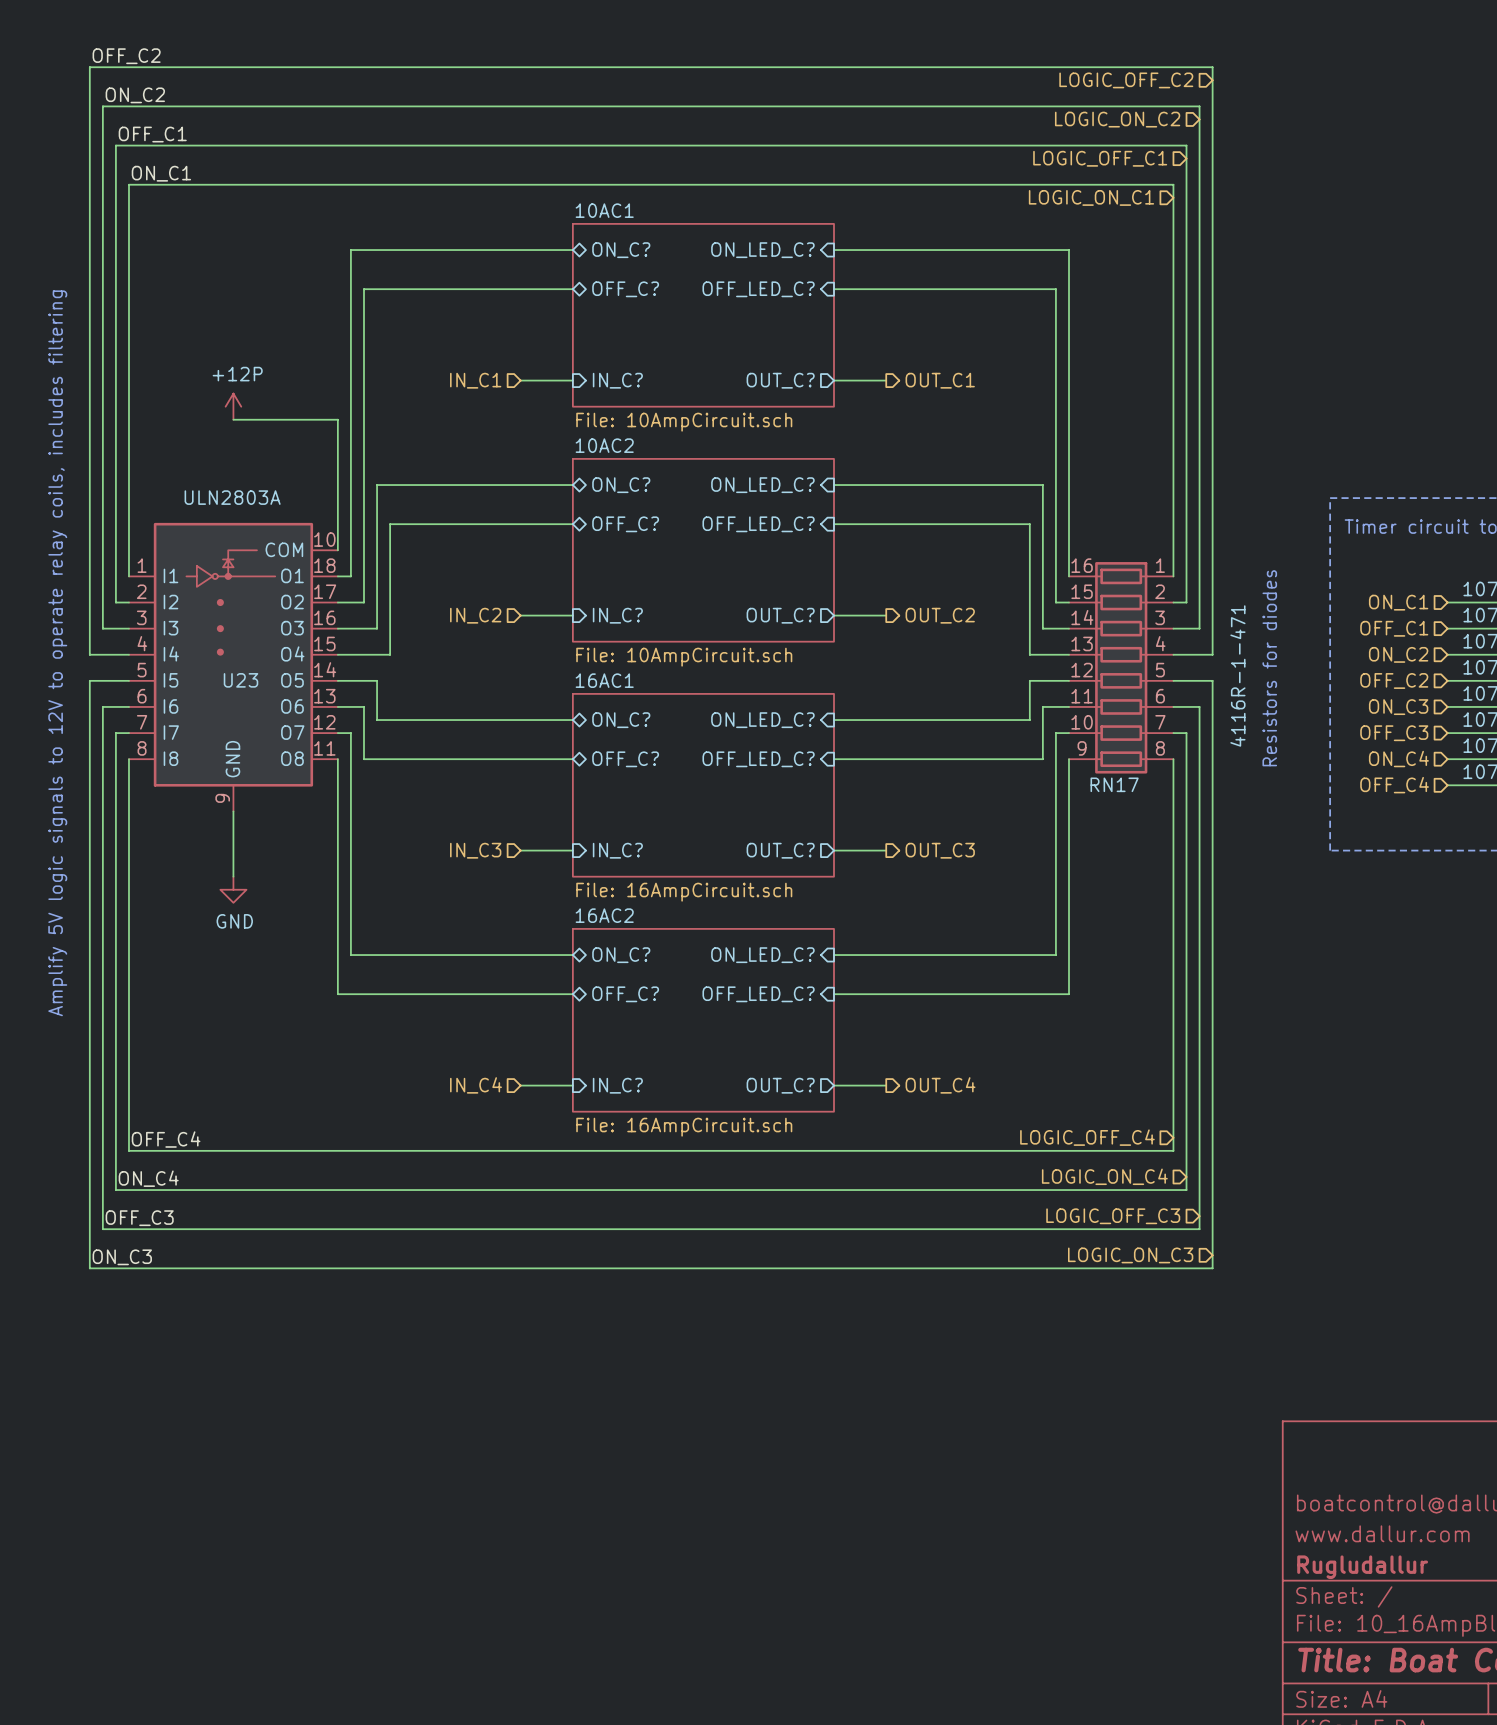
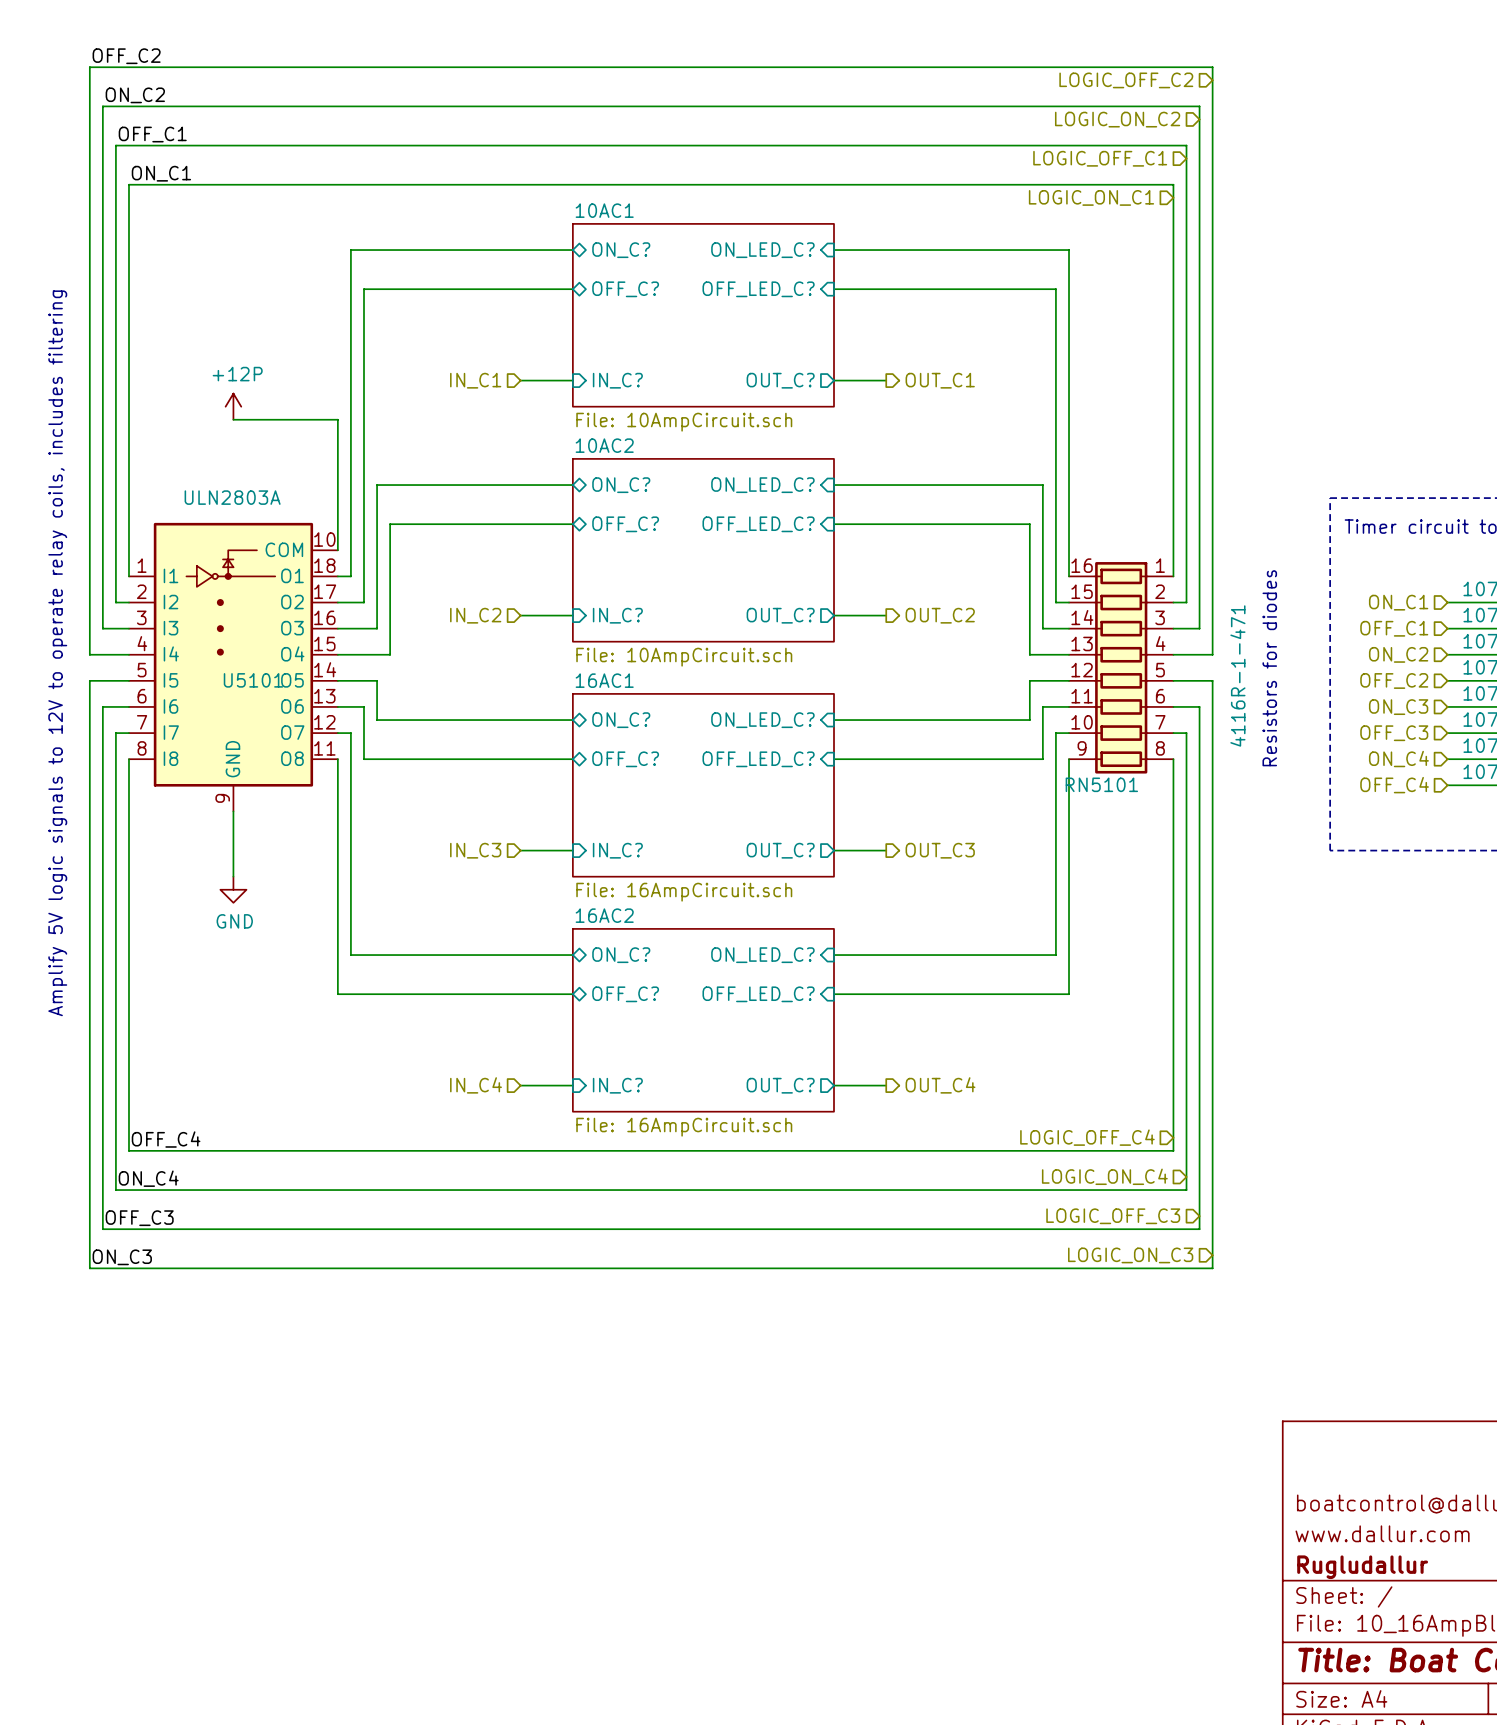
U23 name: U23 (240, 680) -> U5101 (253, 680)
RN17 name: RN17 (1114, 784) -> RN5101 (1101, 784)

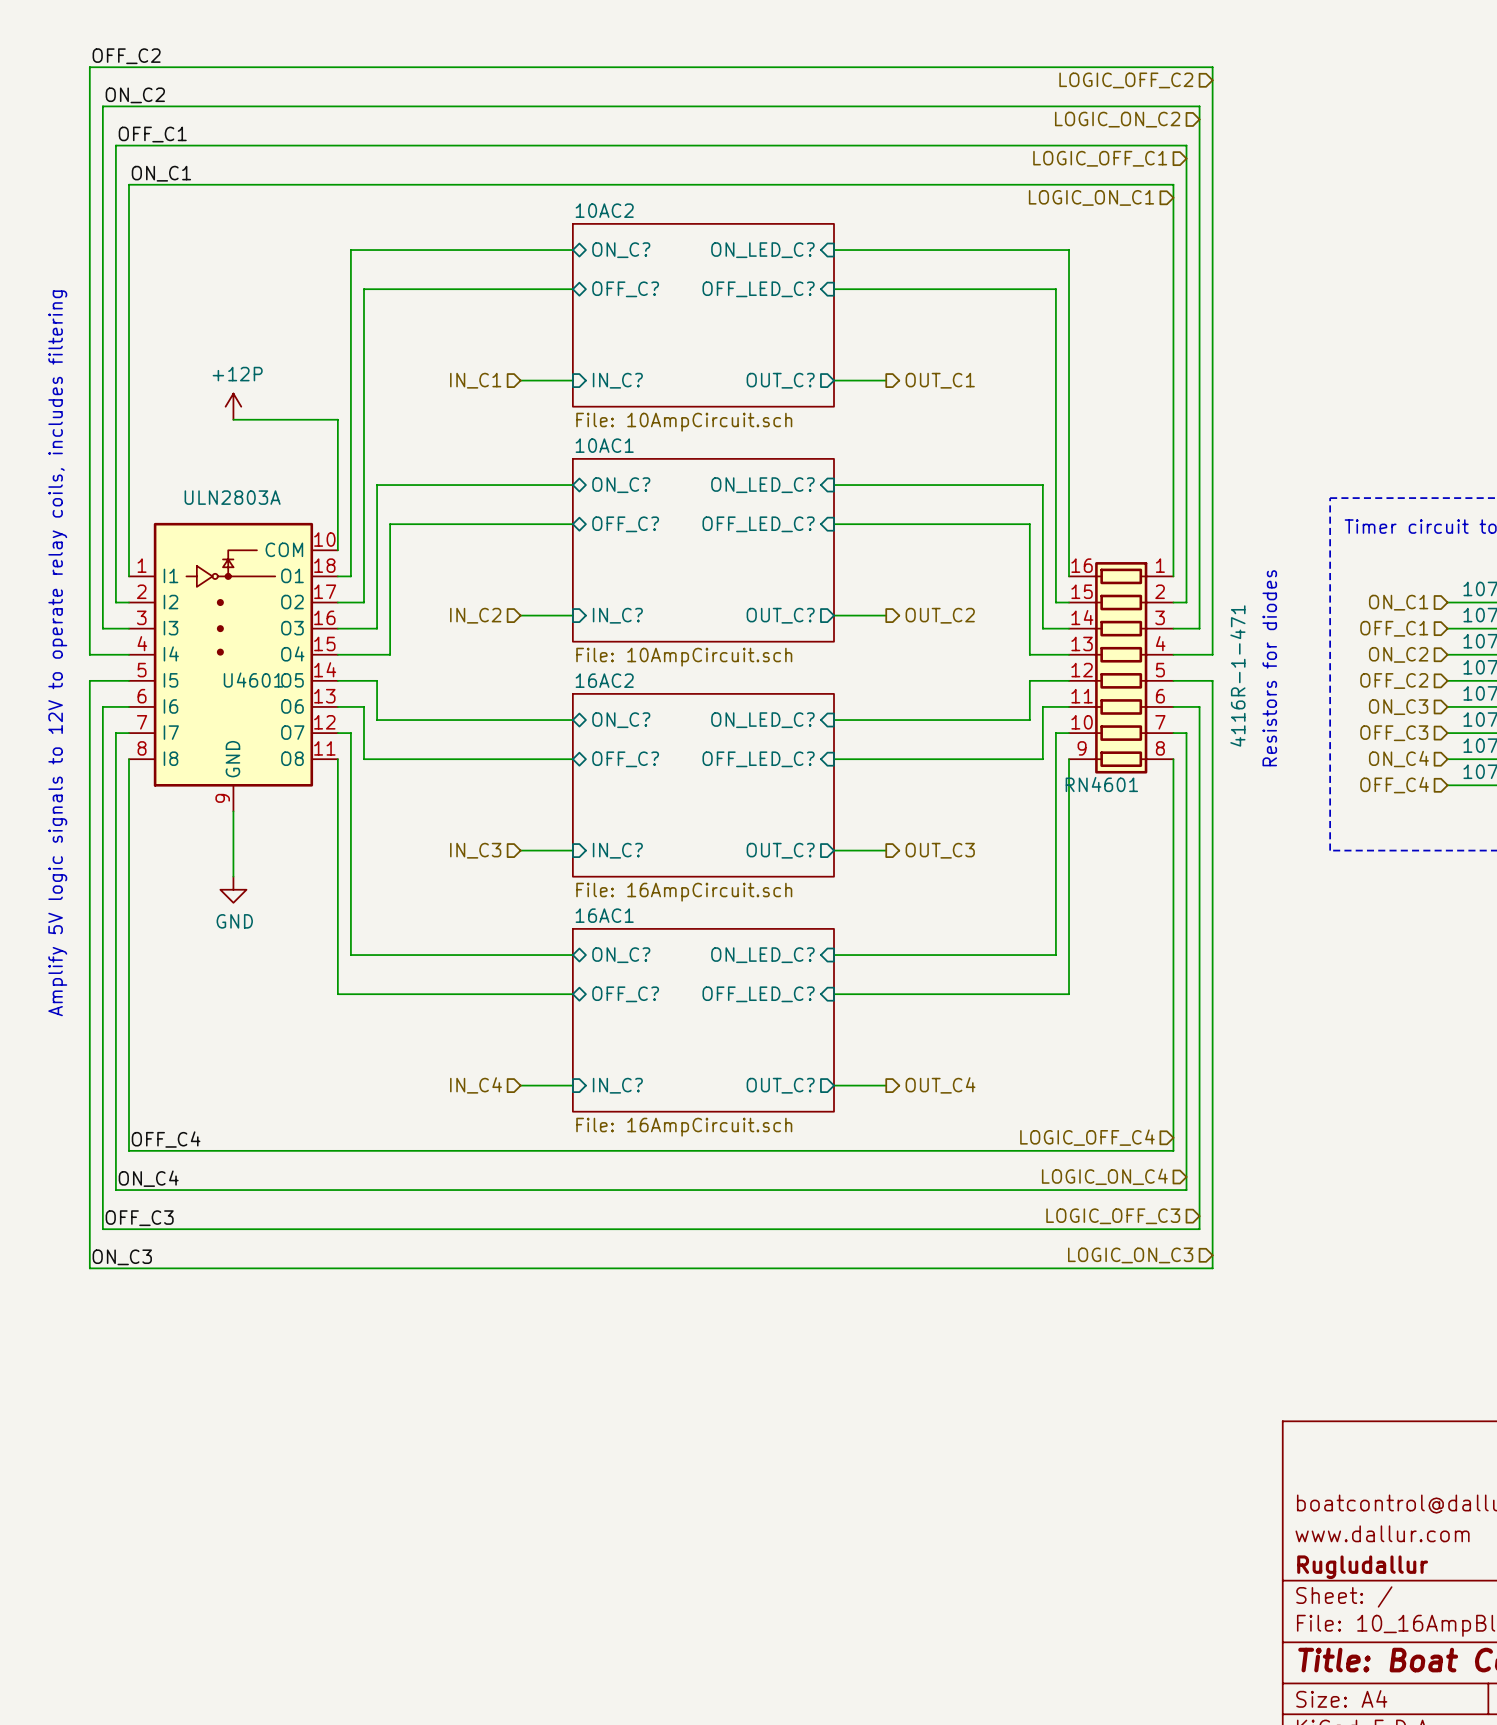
sheet 10AC1 name: 10AC1 (604, 210) -> 10AC2 (604, 210)
sheet 10AC2 name: 10AC2 (604, 445) -> 10AC1 (604, 445)
U5101 name: U5101 (253, 680) -> U4601 (253, 680)
sheet 16AC1 name: 16AC1 (604, 680) -> 16AC2 (604, 680)
RN5101 name: RN5101 (1101, 784) -> RN4601 (1101, 784)
sheet 16AC2 name: 16AC2 (604, 915) -> 16AC1 (604, 915)

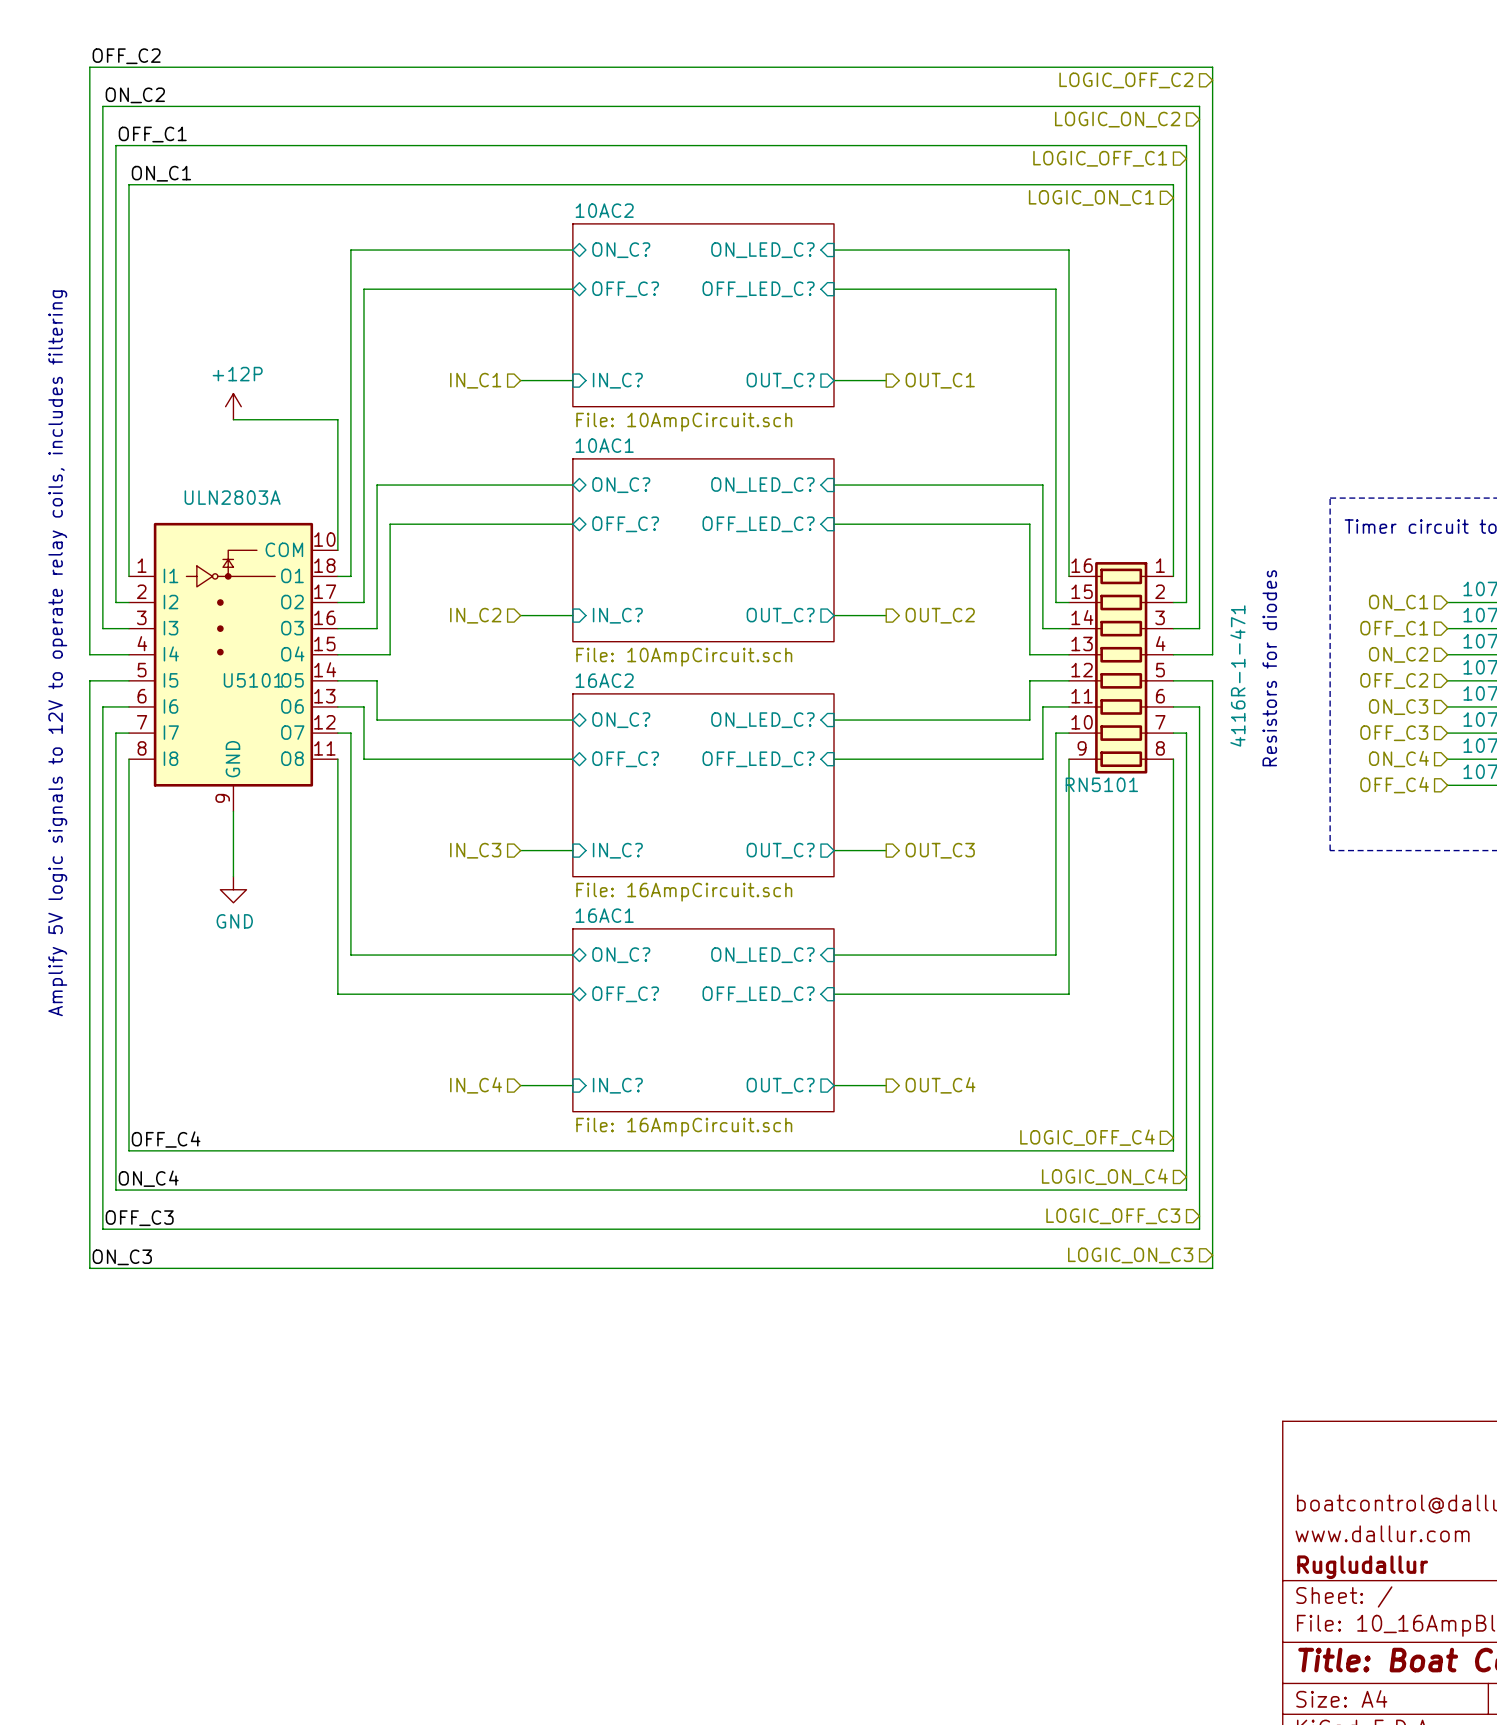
U4601 name: U4601 (253, 680) -> U5101 (253, 680)
RN4601 name: RN4601 (1101, 784) -> RN5101 (1101, 784)

